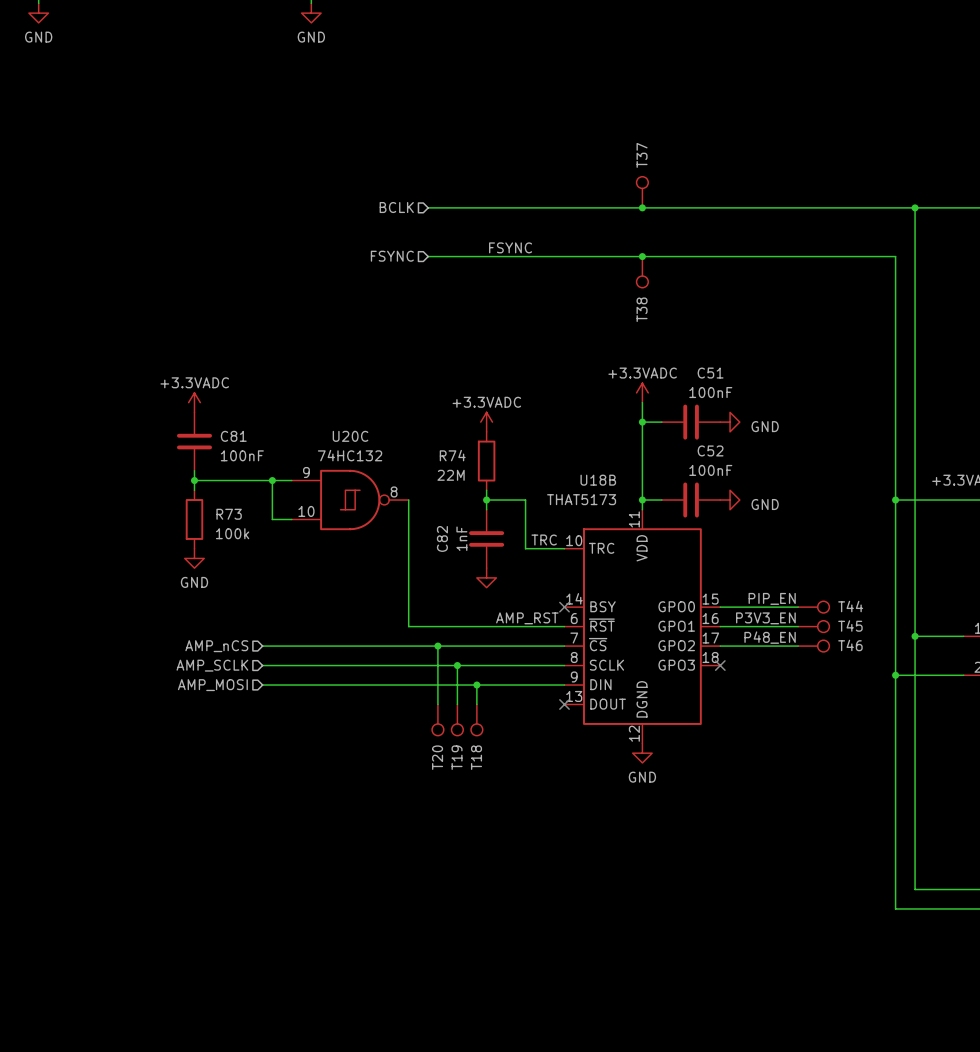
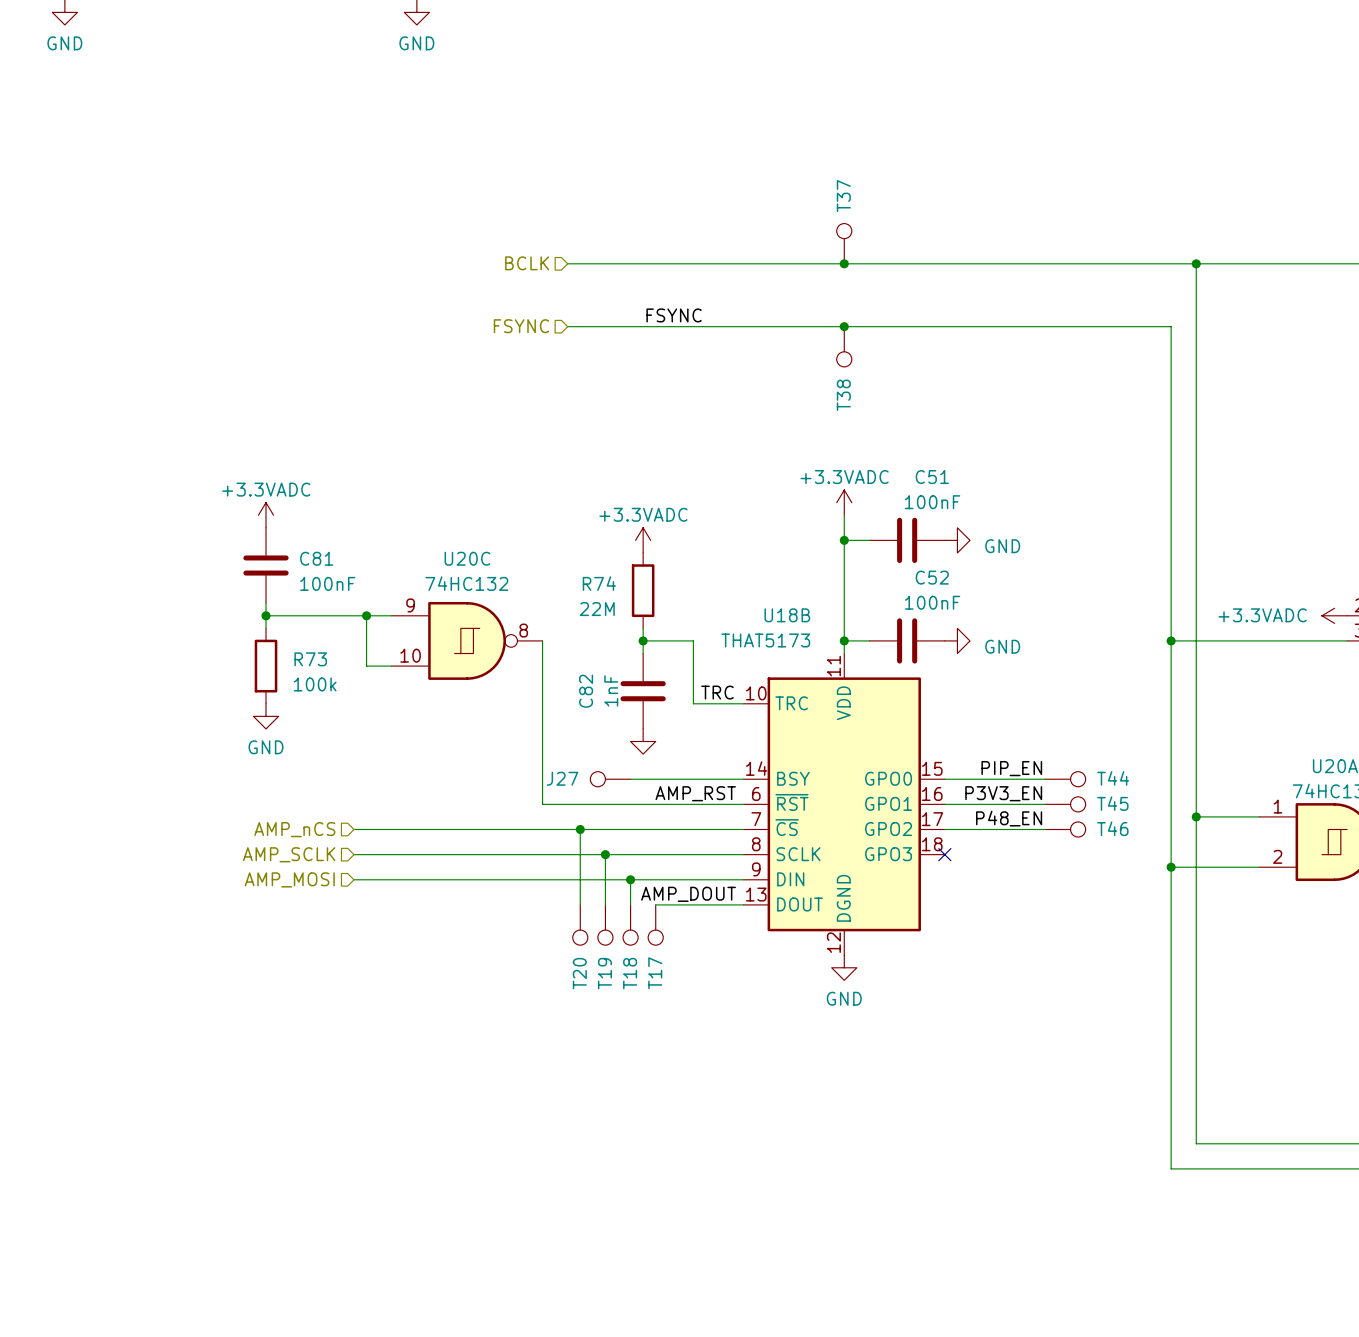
J27: none -> (610, 779)
wire: none -> (630, 779) (743, 779)
no-connect mark: (564, 607) -> none
label: none -> AMP_DOUT (688, 894)
wire: none -> (655, 904) (743, 904)
no-connect mark: (564, 704) -> none
T17: none -> (655, 925)

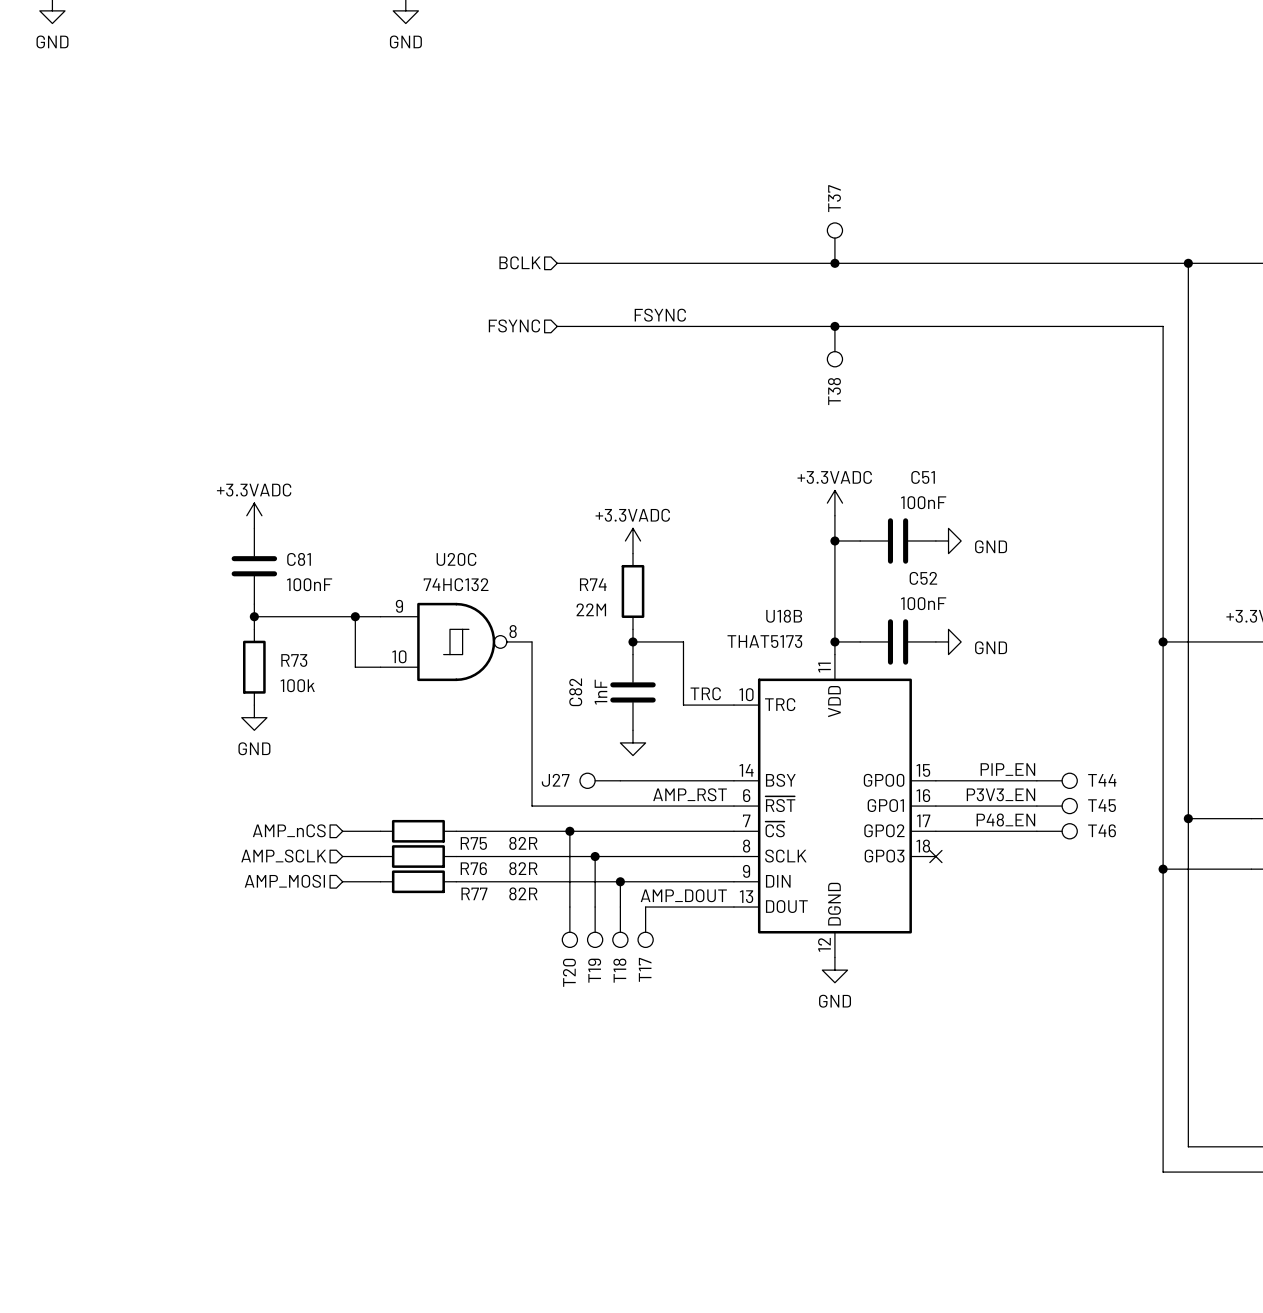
wire: (391, 829) (467, 829) -> none
R75: none -> 82R (418, 831)
wire: (391, 854) (467, 854) -> none
R76: none -> 82R (418, 856)
wire: (391, 879) (467, 879) -> none
R77: none -> 82R (418, 881)

